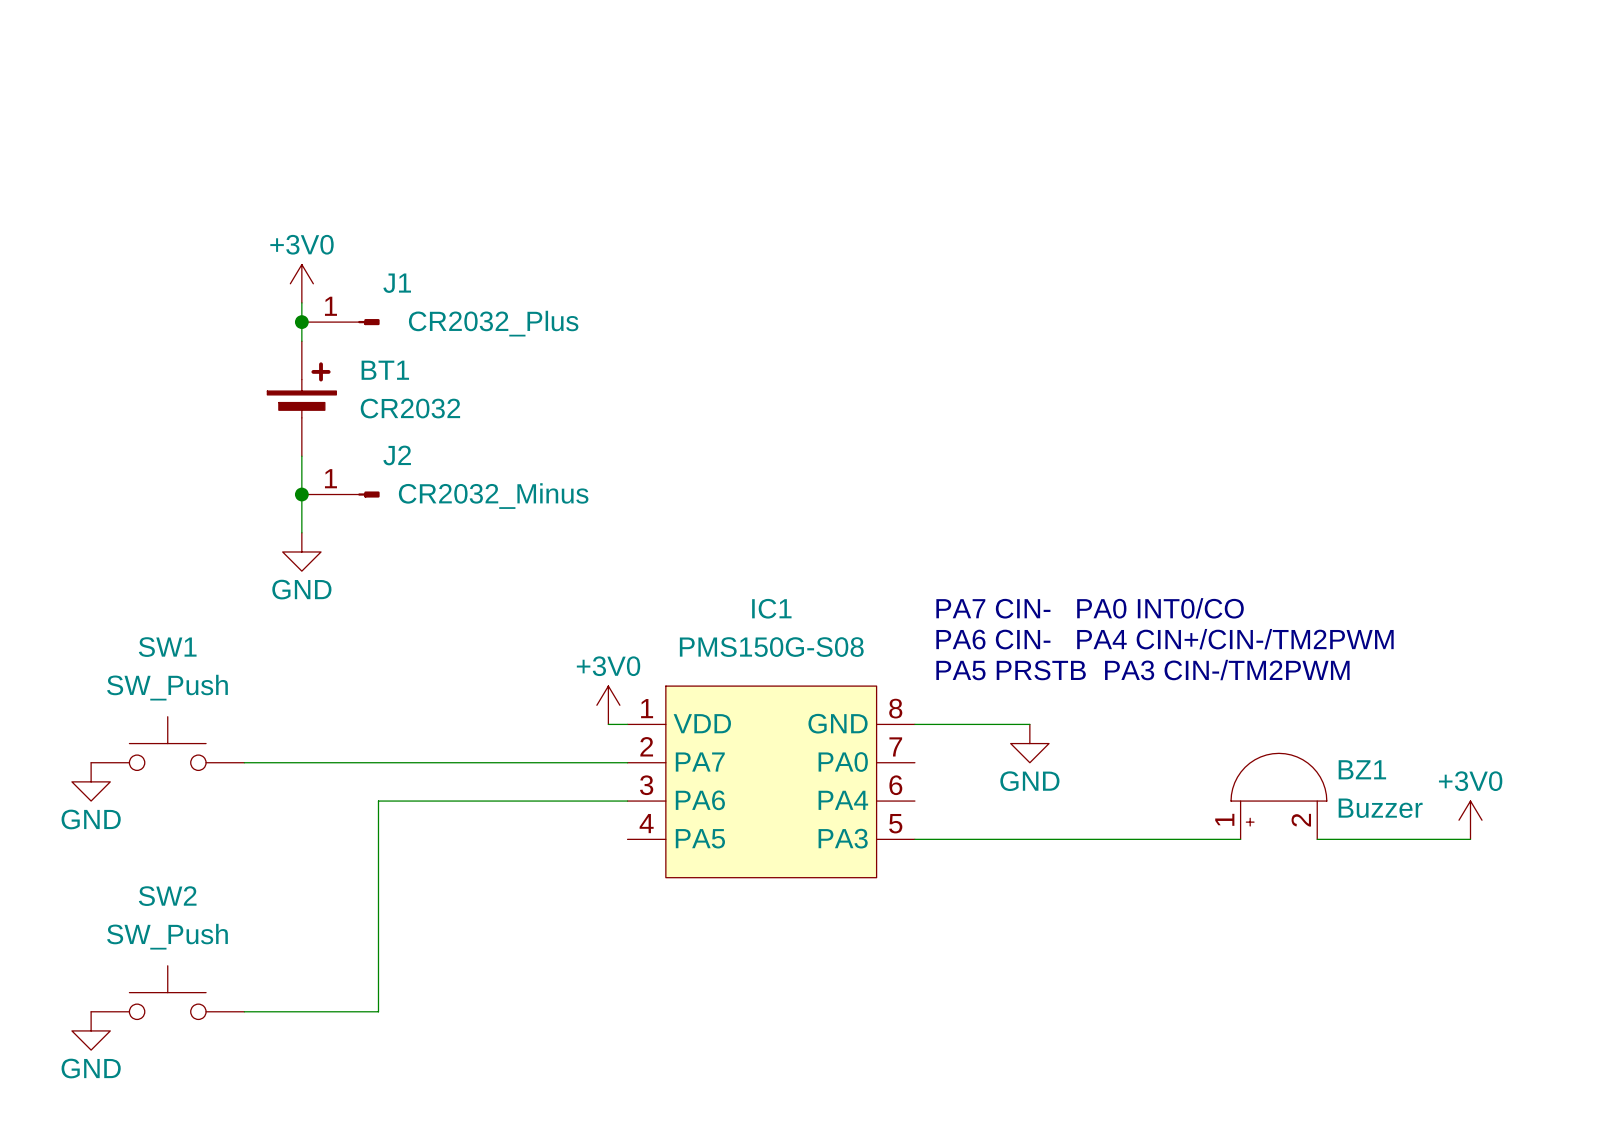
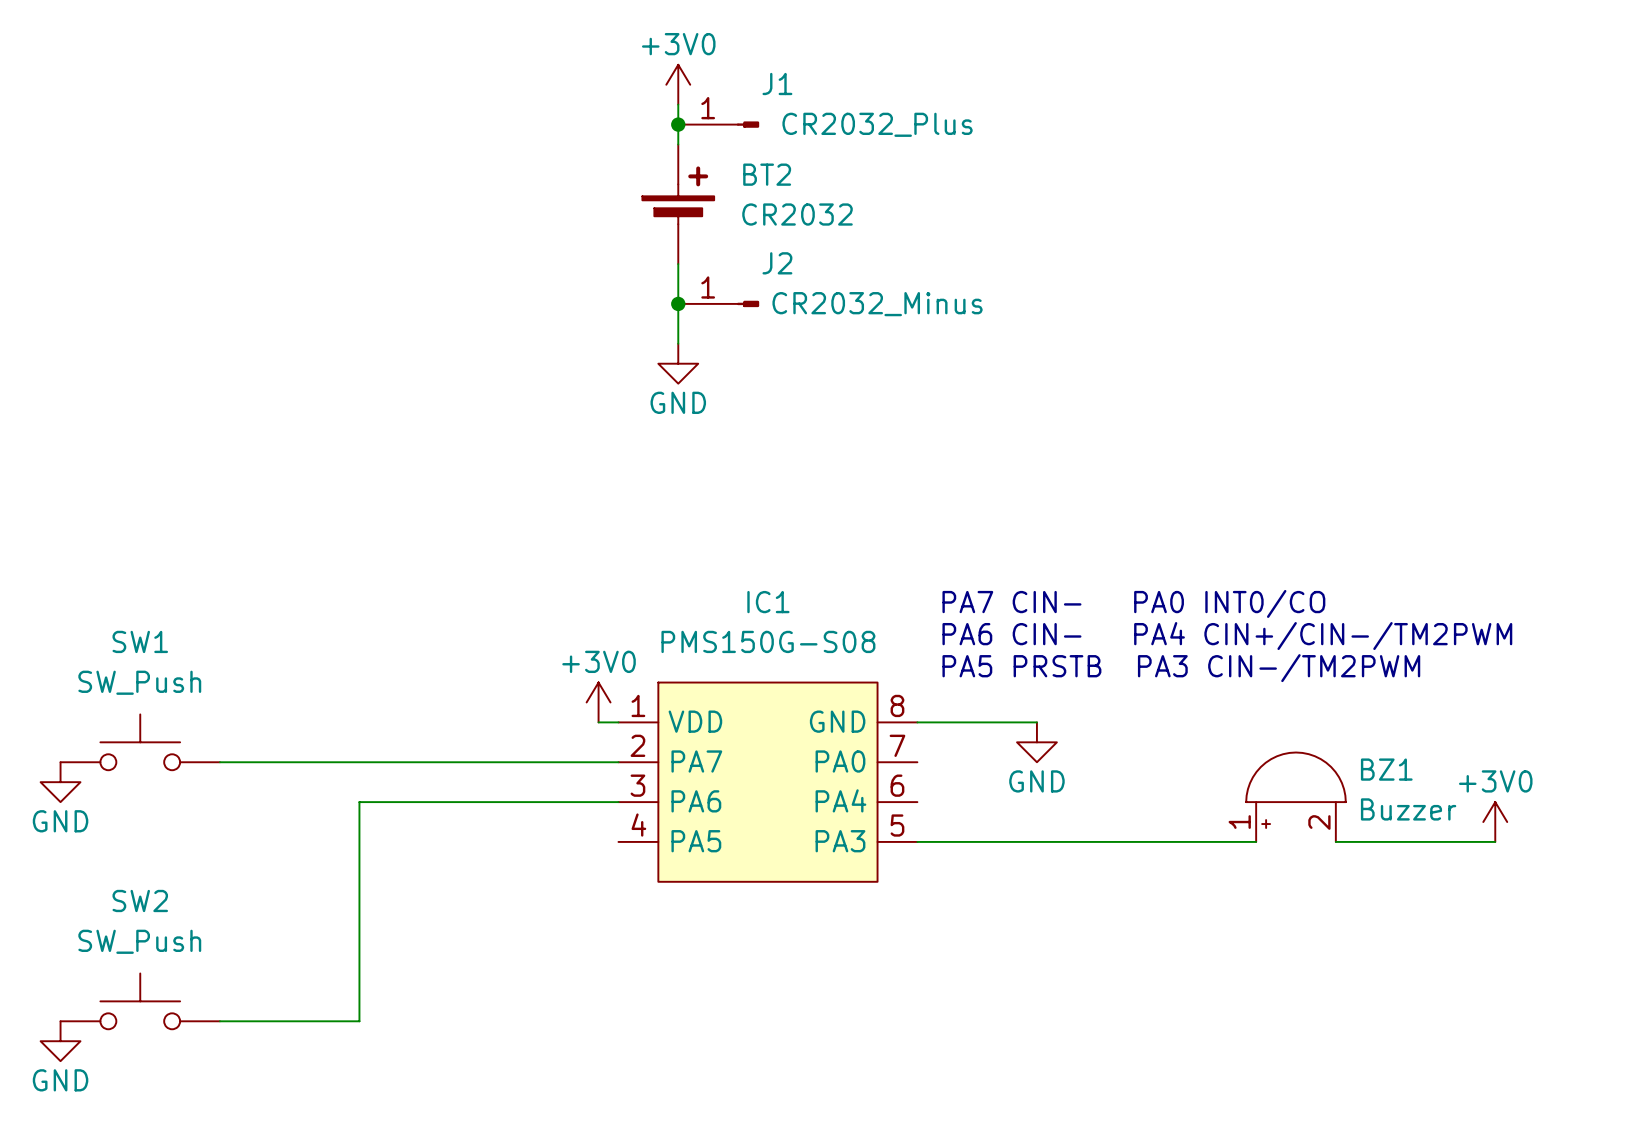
power symbol: none -> +3V0 (678, 84)
wire: none -> (678, 104) (678, 144)
junction: none -> (678, 124)
BT2: none -> CR2032 (678, 204)
power symbol: +3V0 (301, 283) -> none
wire: none -> (678, 264) (678, 343)
wire: (301, 302) (301, 341) -> none
junction: (301, 322) -> none
J1 position: (340, 322) -> (718, 124)
junction: none -> (678, 303)
power symbol: none -> GND (678, 363)
BT1: CR2032 (301, 398) -> none
wire: (301, 456) (301, 532) -> none
junction: (301, 494) -> none
J2 position: (340, 494) -> (718, 303)
power symbol: GND (301, 551) -> none

